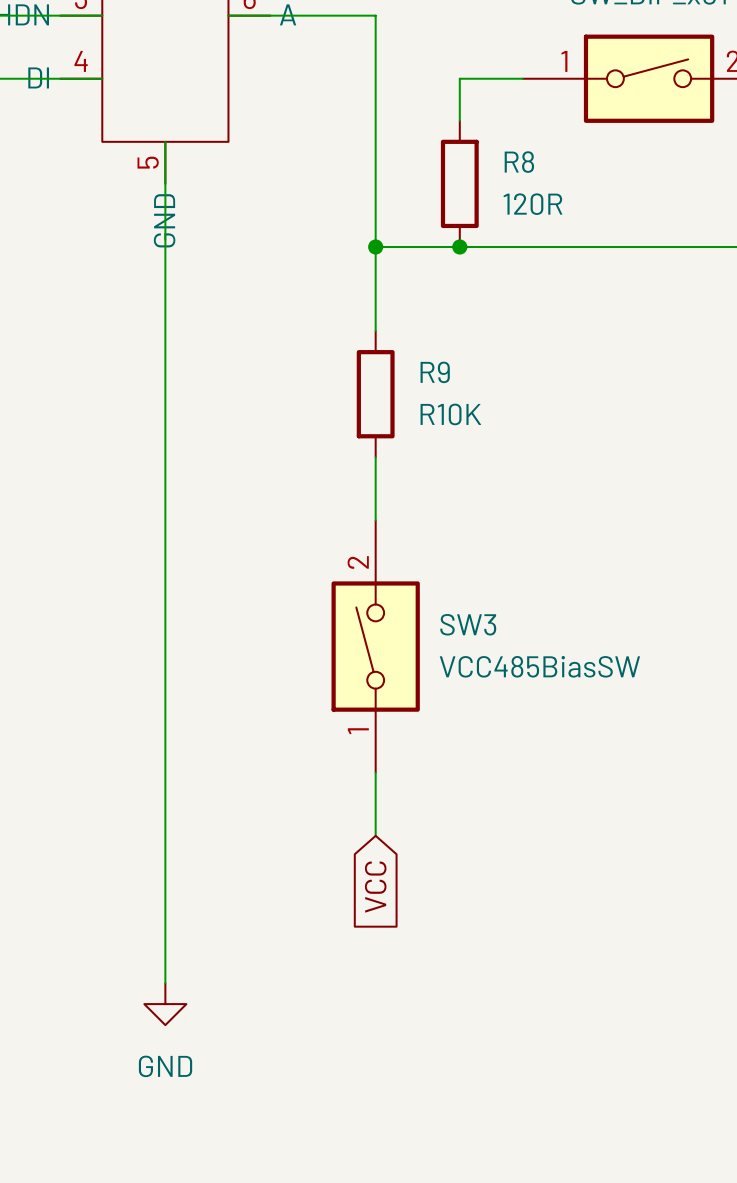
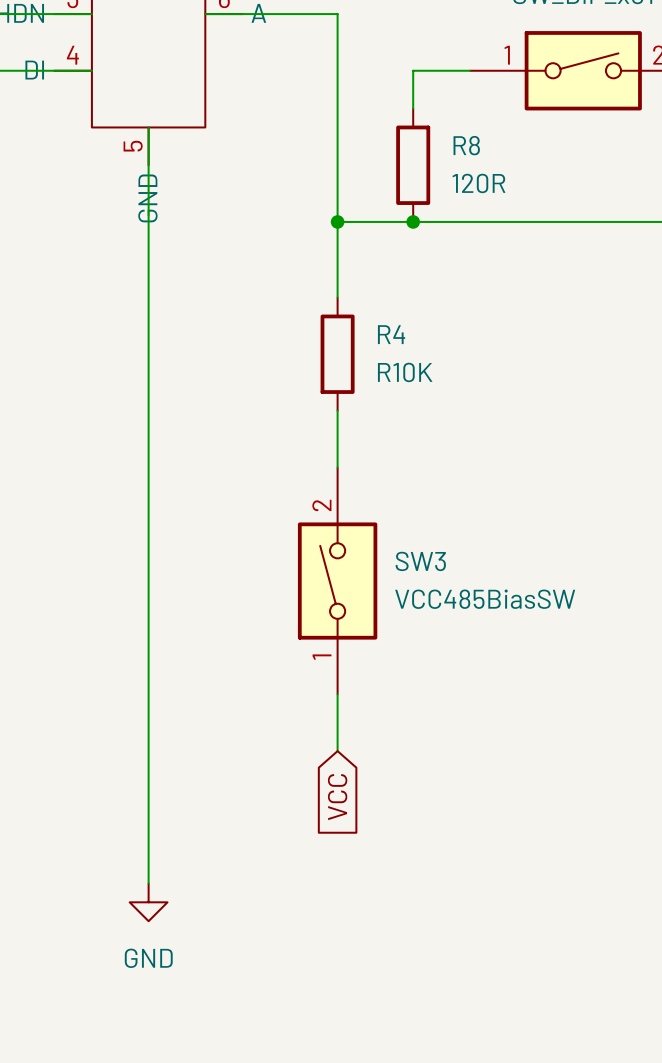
R9 name: R9 (435, 372) -> R4 (391, 334)

